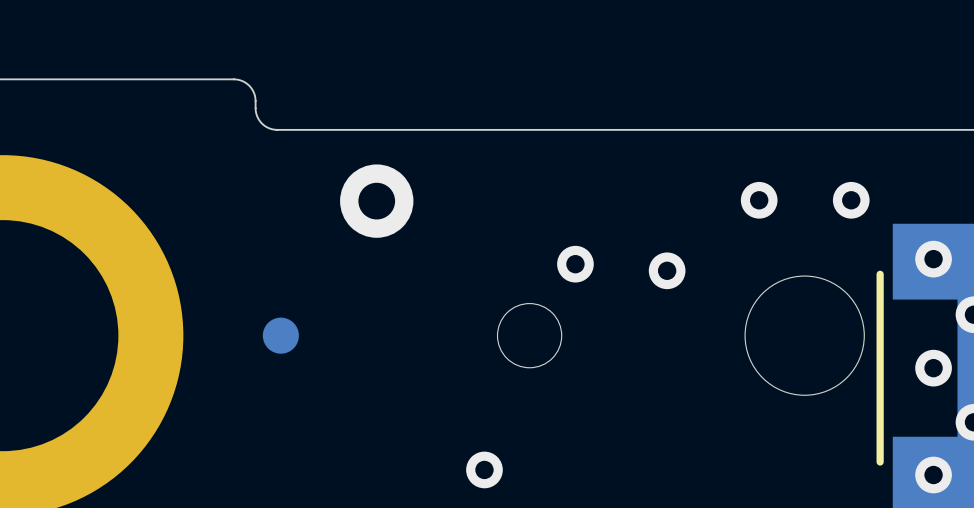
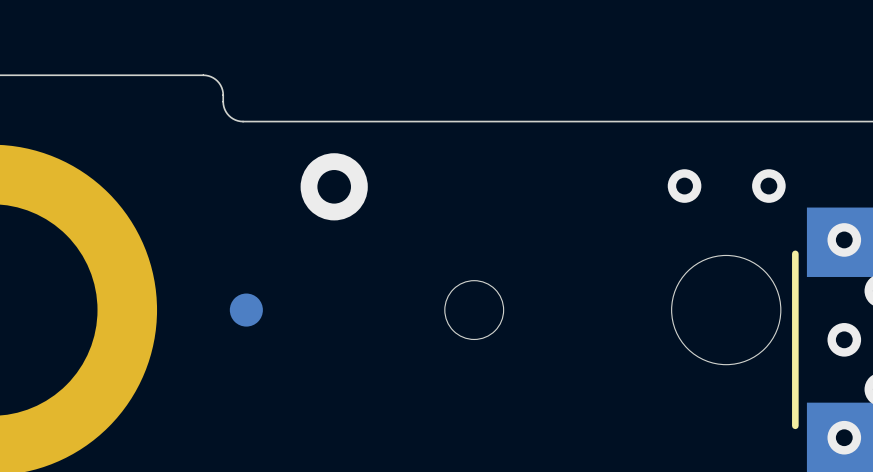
via: (575, 264) -> none
via: (667, 270) -> none
via: (484, 469) -> none

